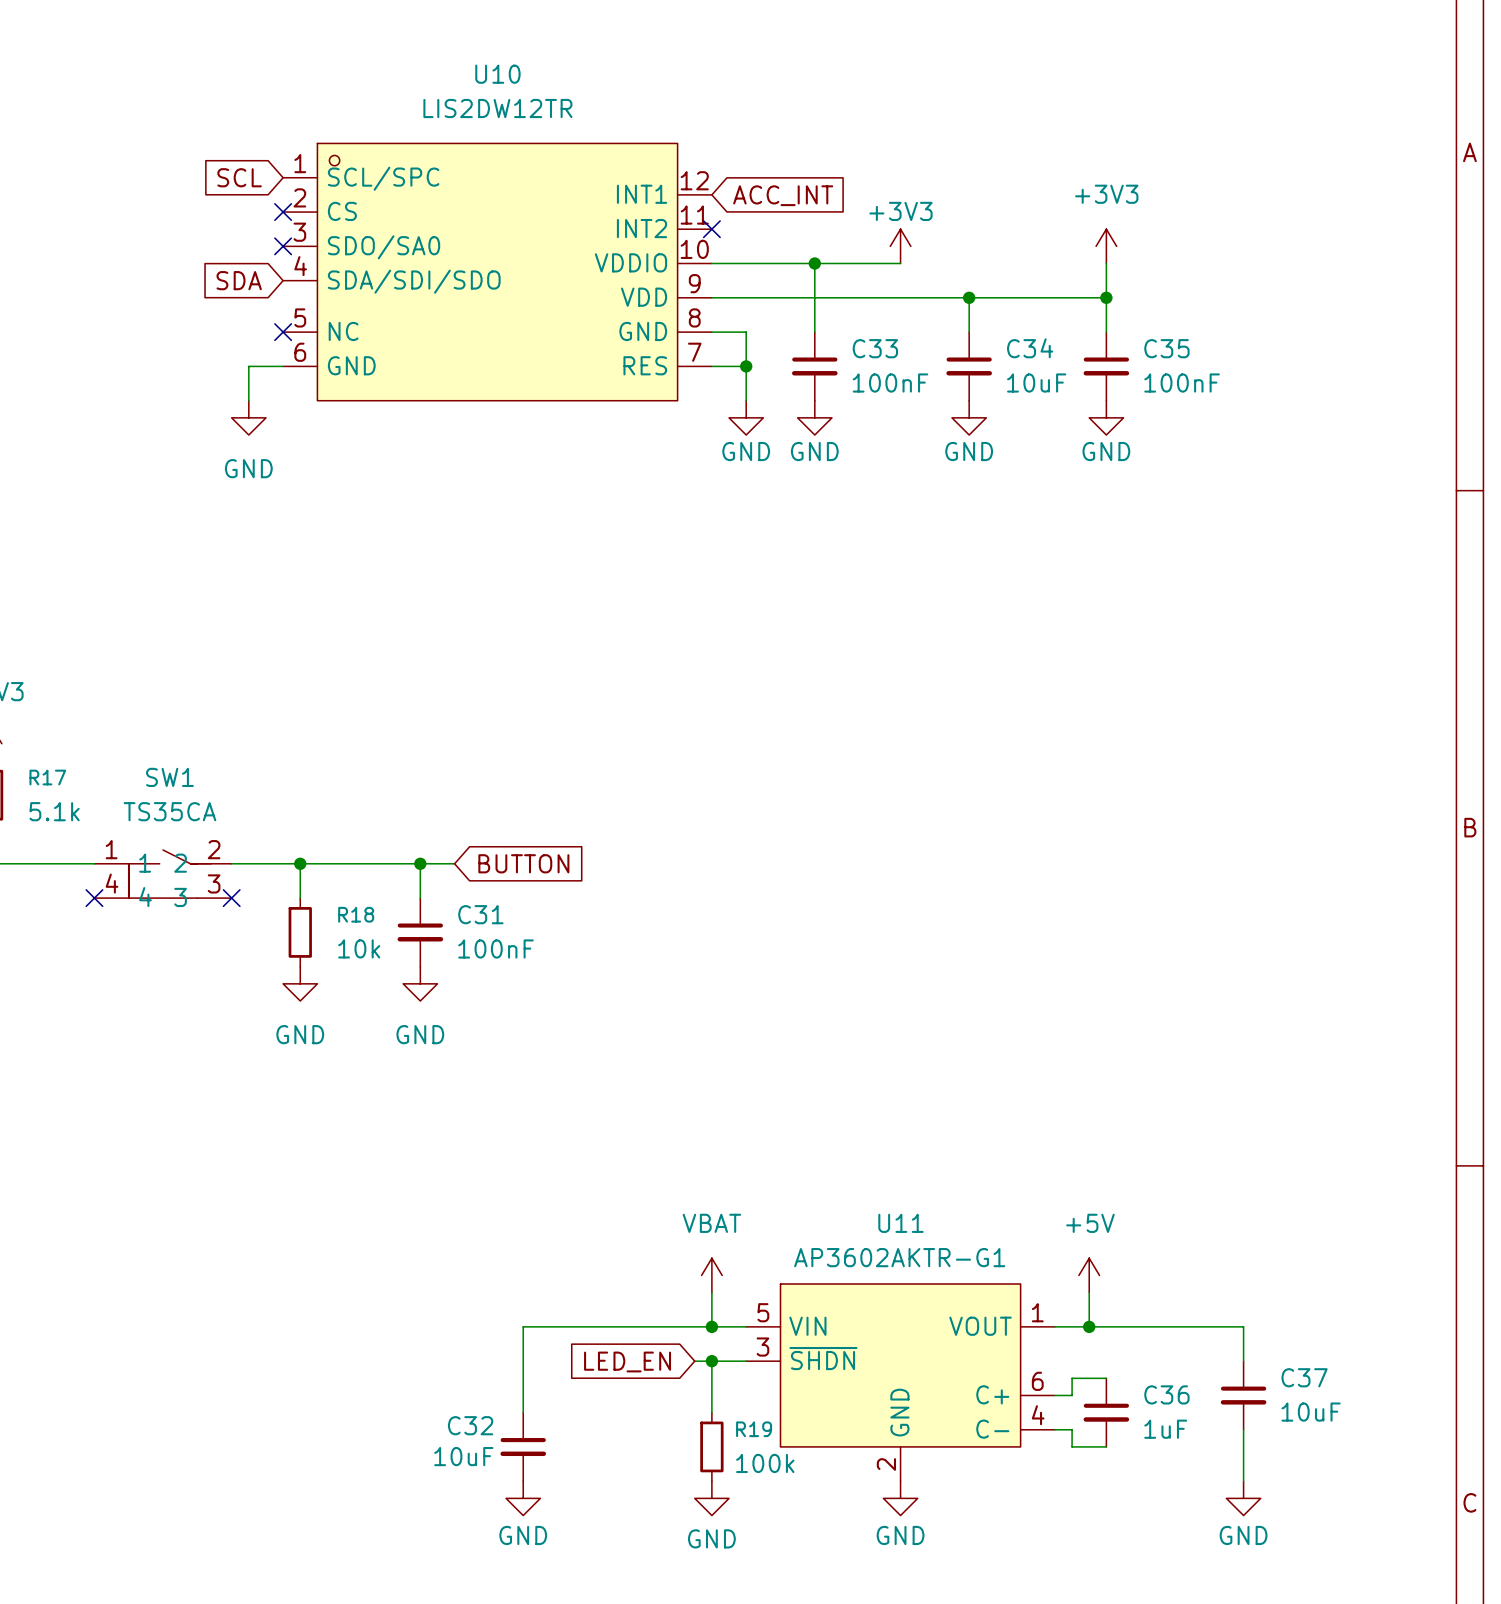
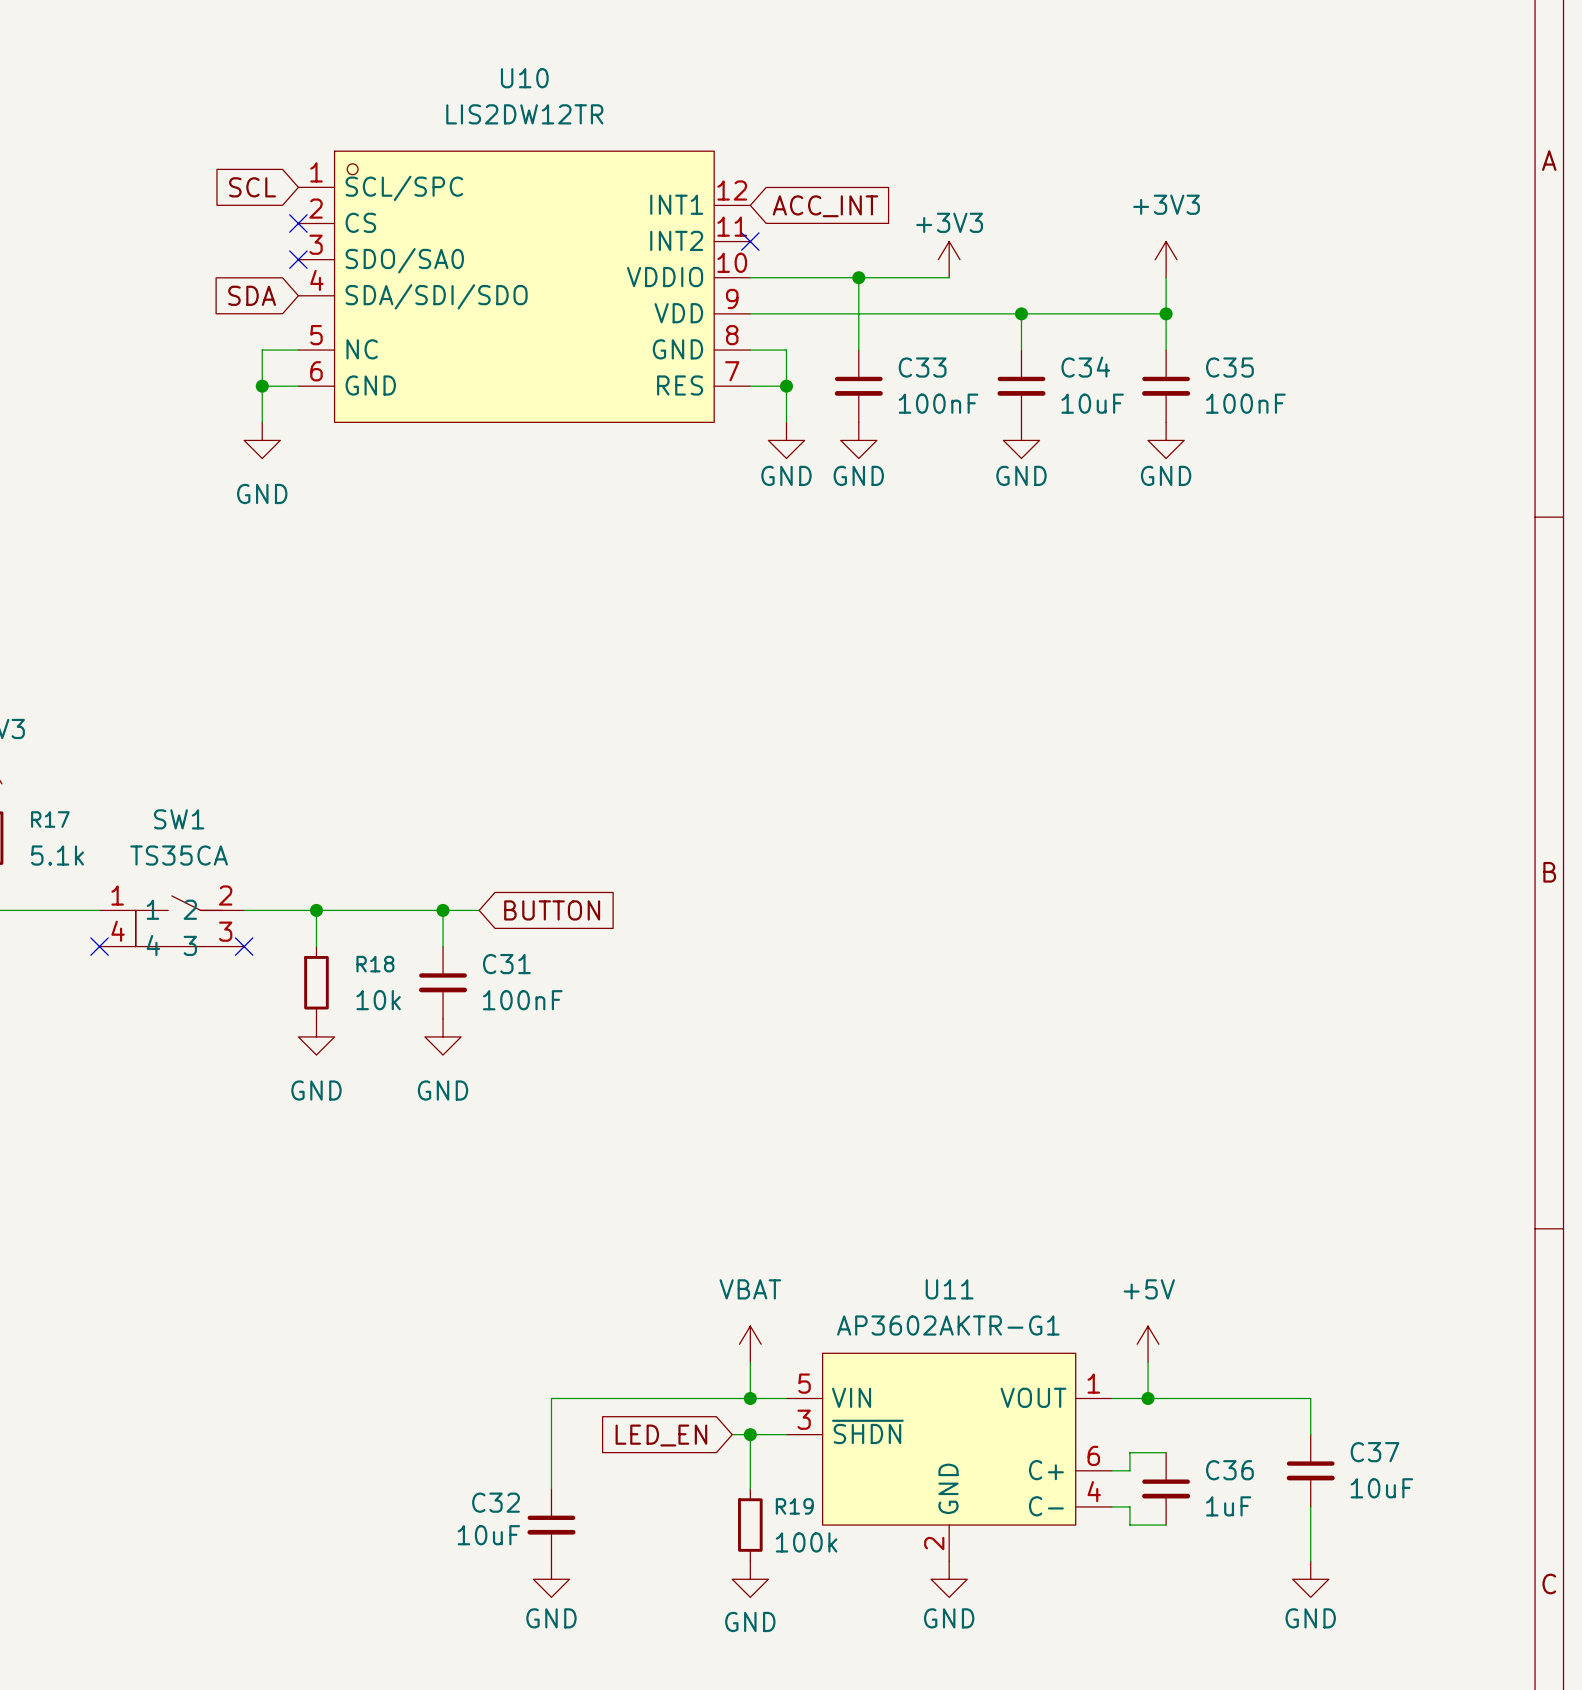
wire: none -> (298, 350) (262, 350) (262, 386)
no-connect mark: (283, 332) -> none
junction: none -> (262, 386)

